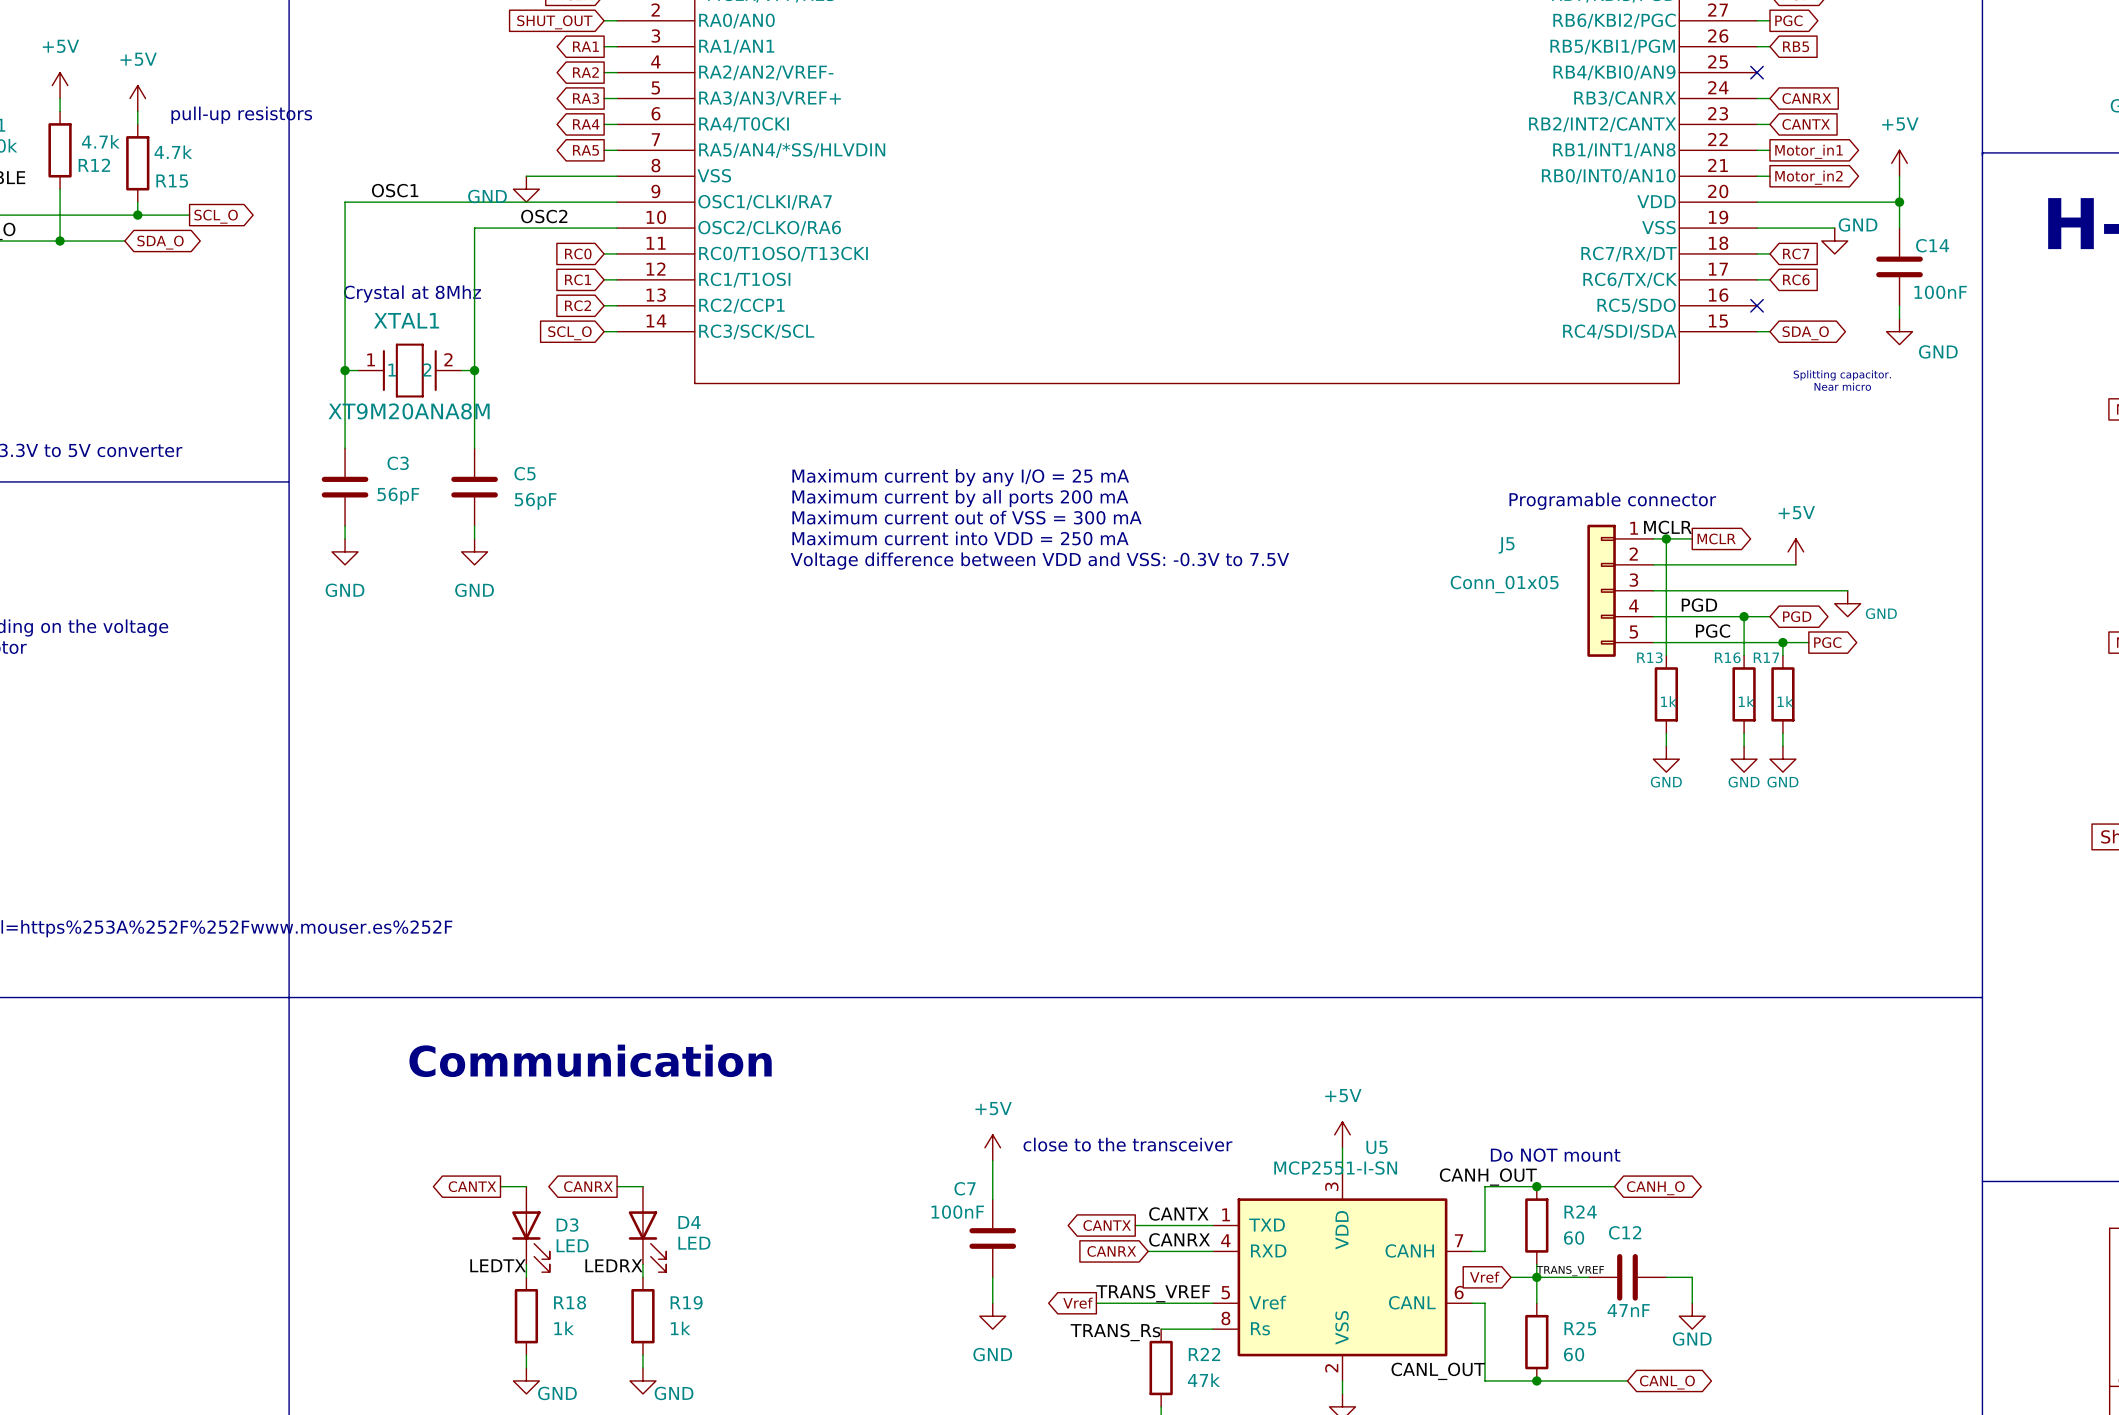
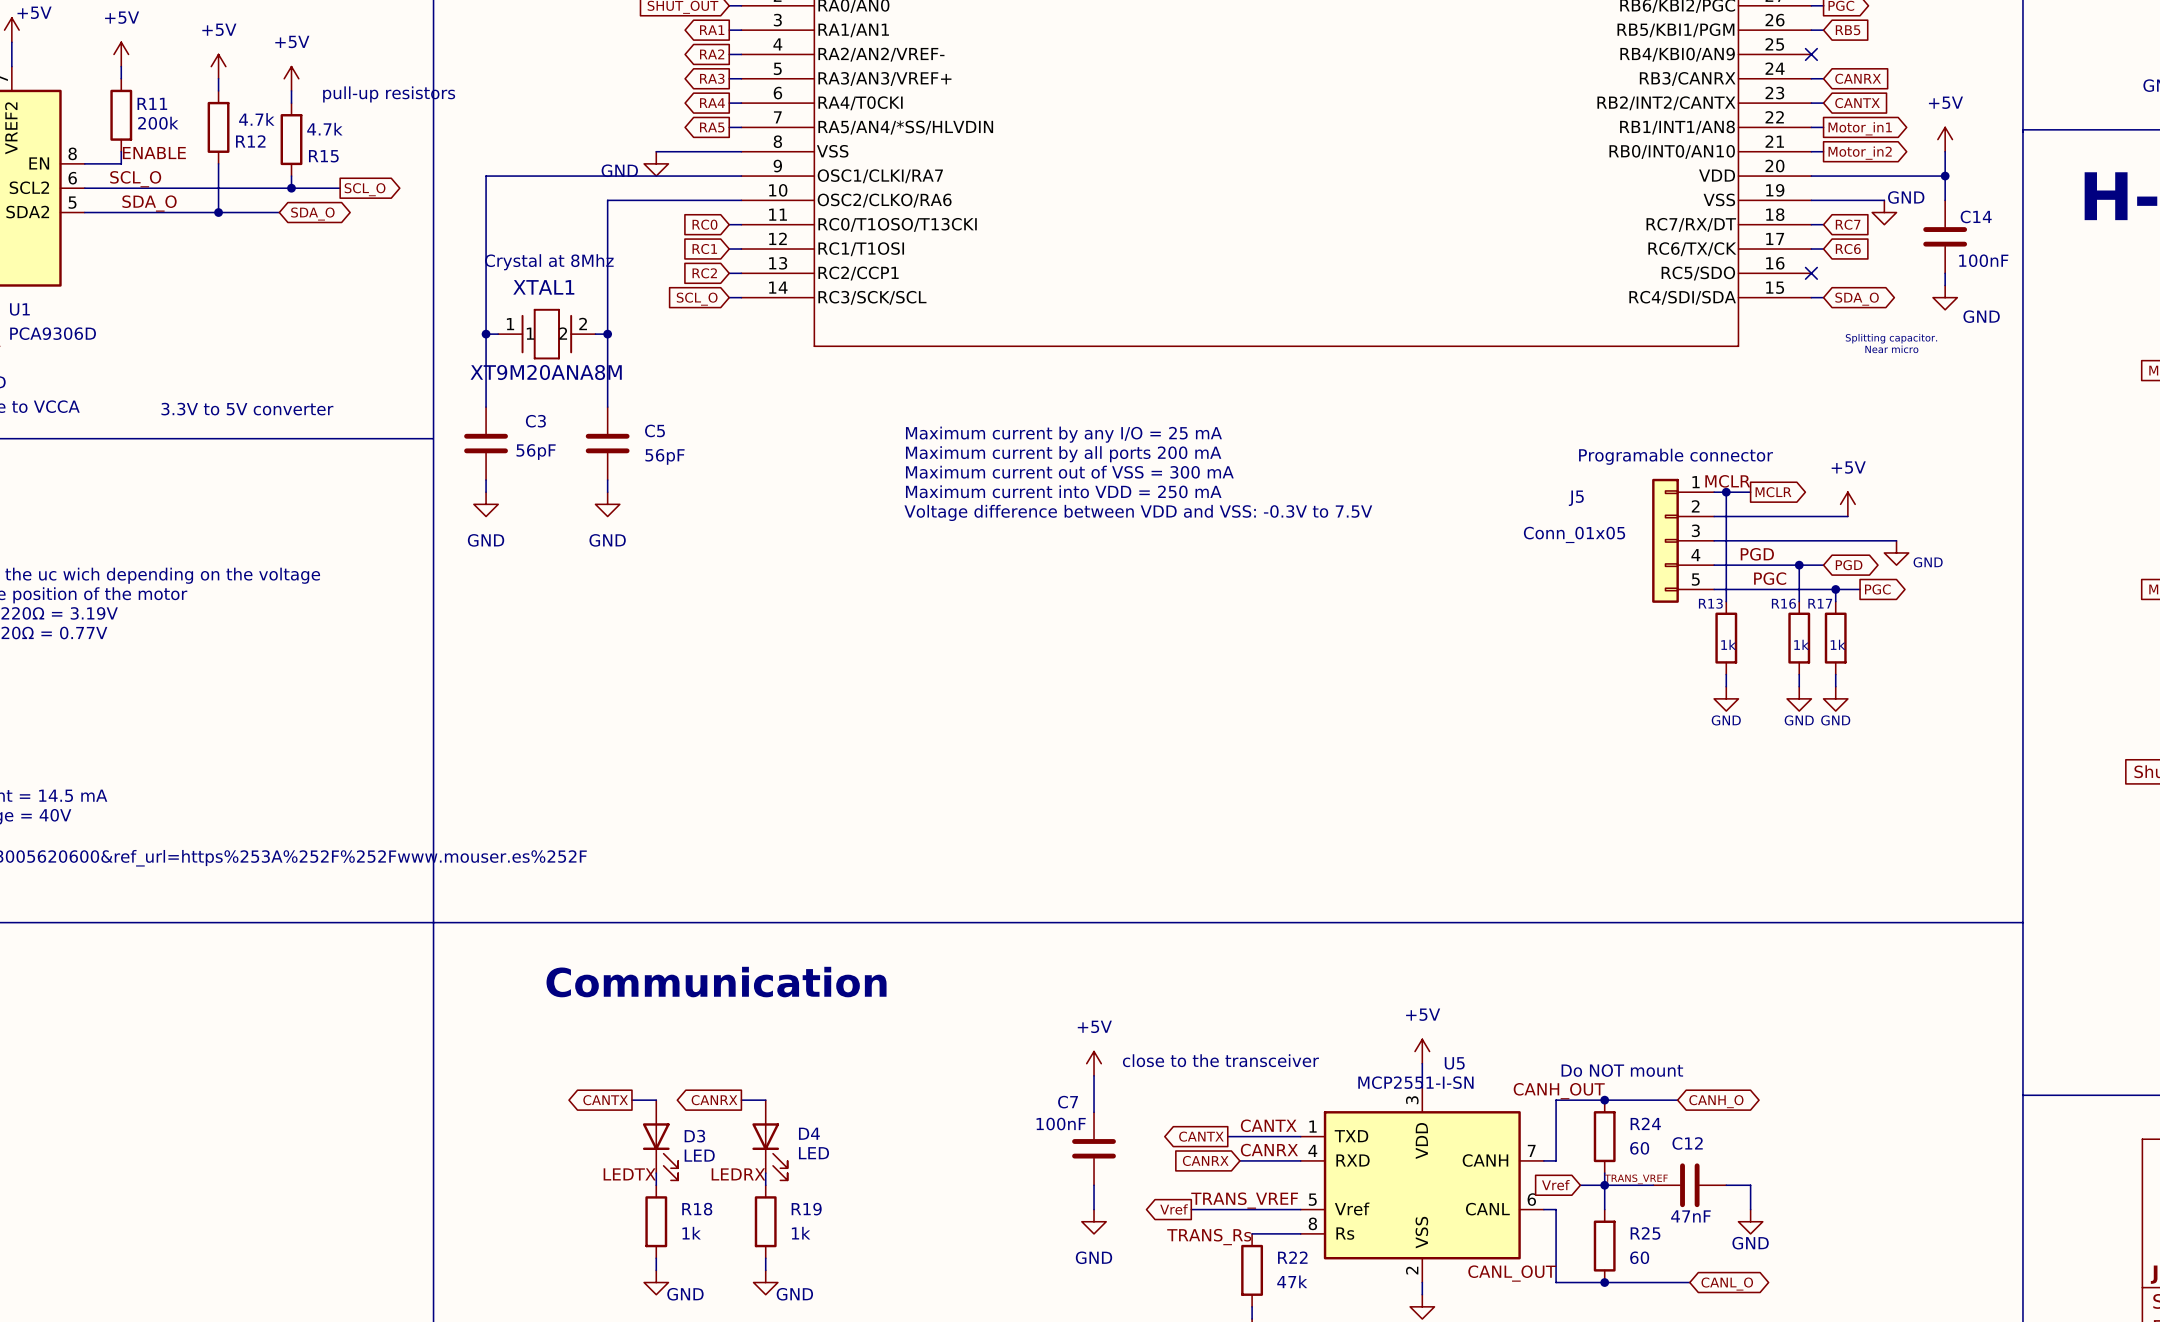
label: OSC1 (395, 190) -> none
label: OSC2 (544, 216) -> none

